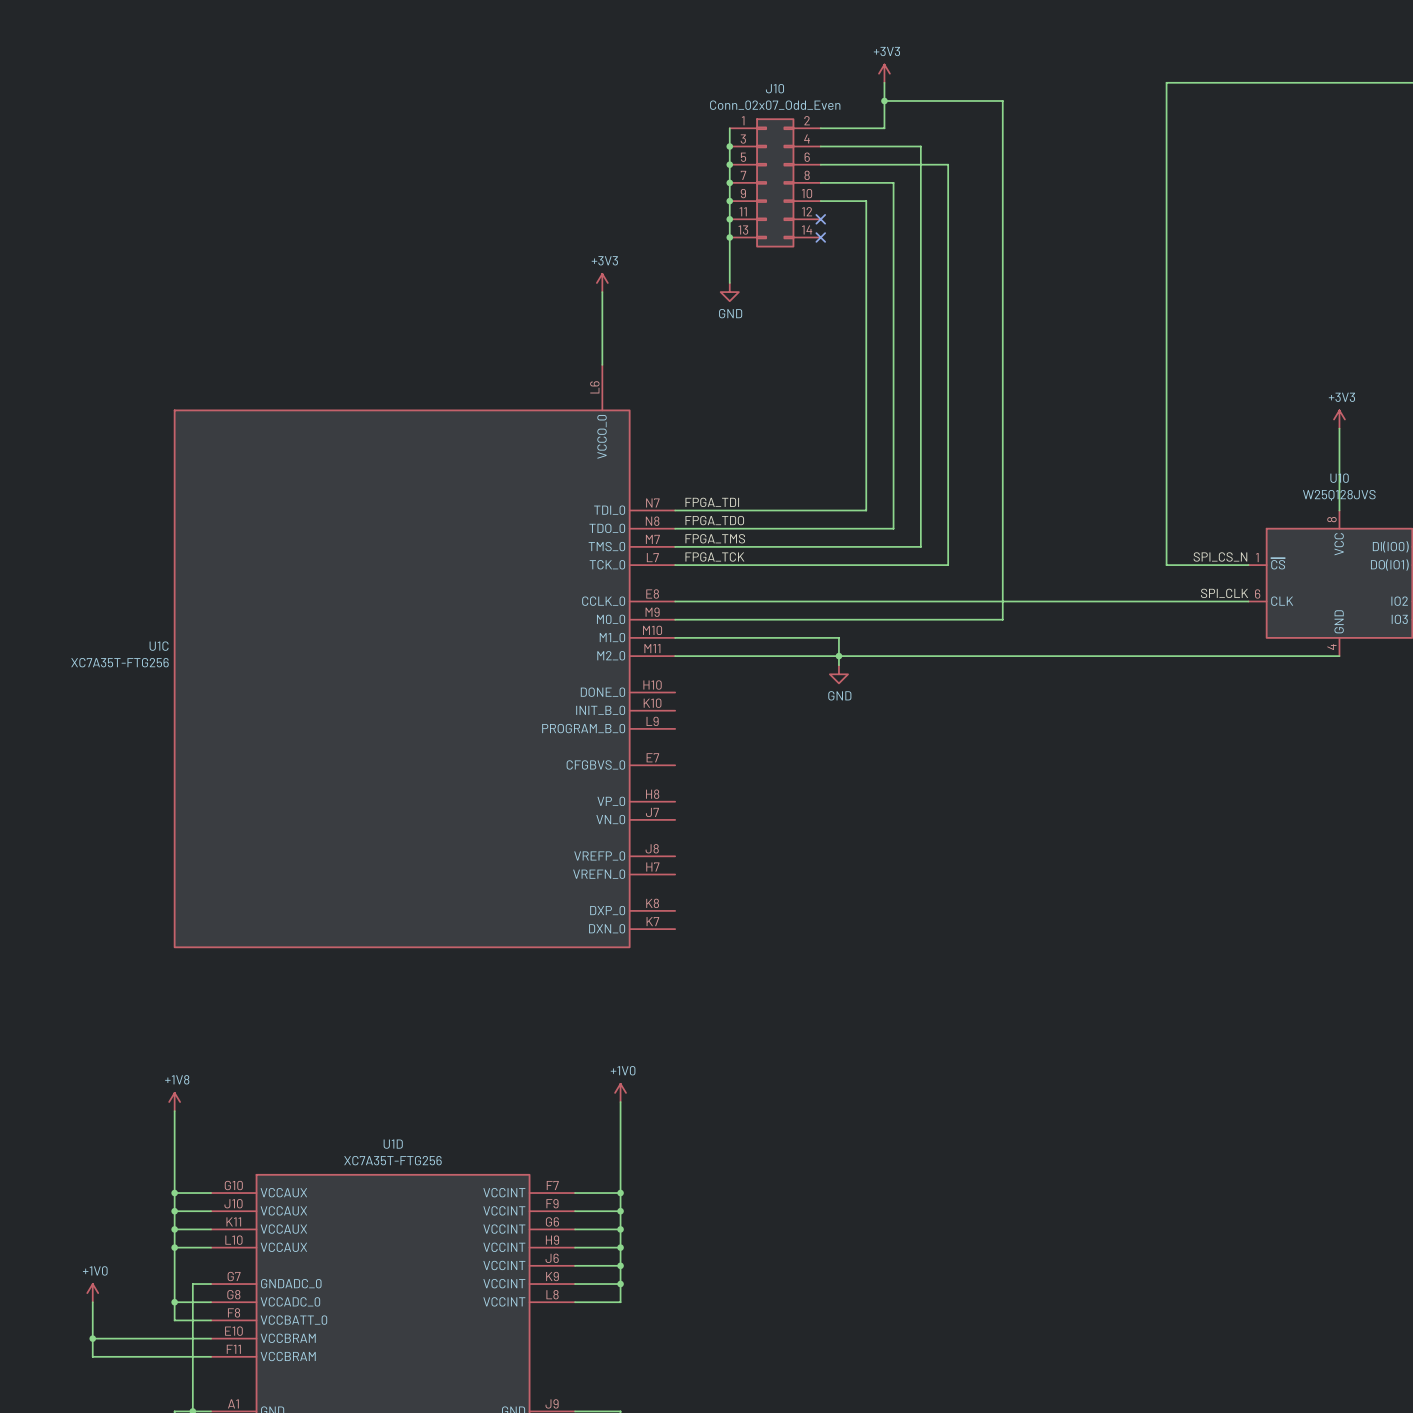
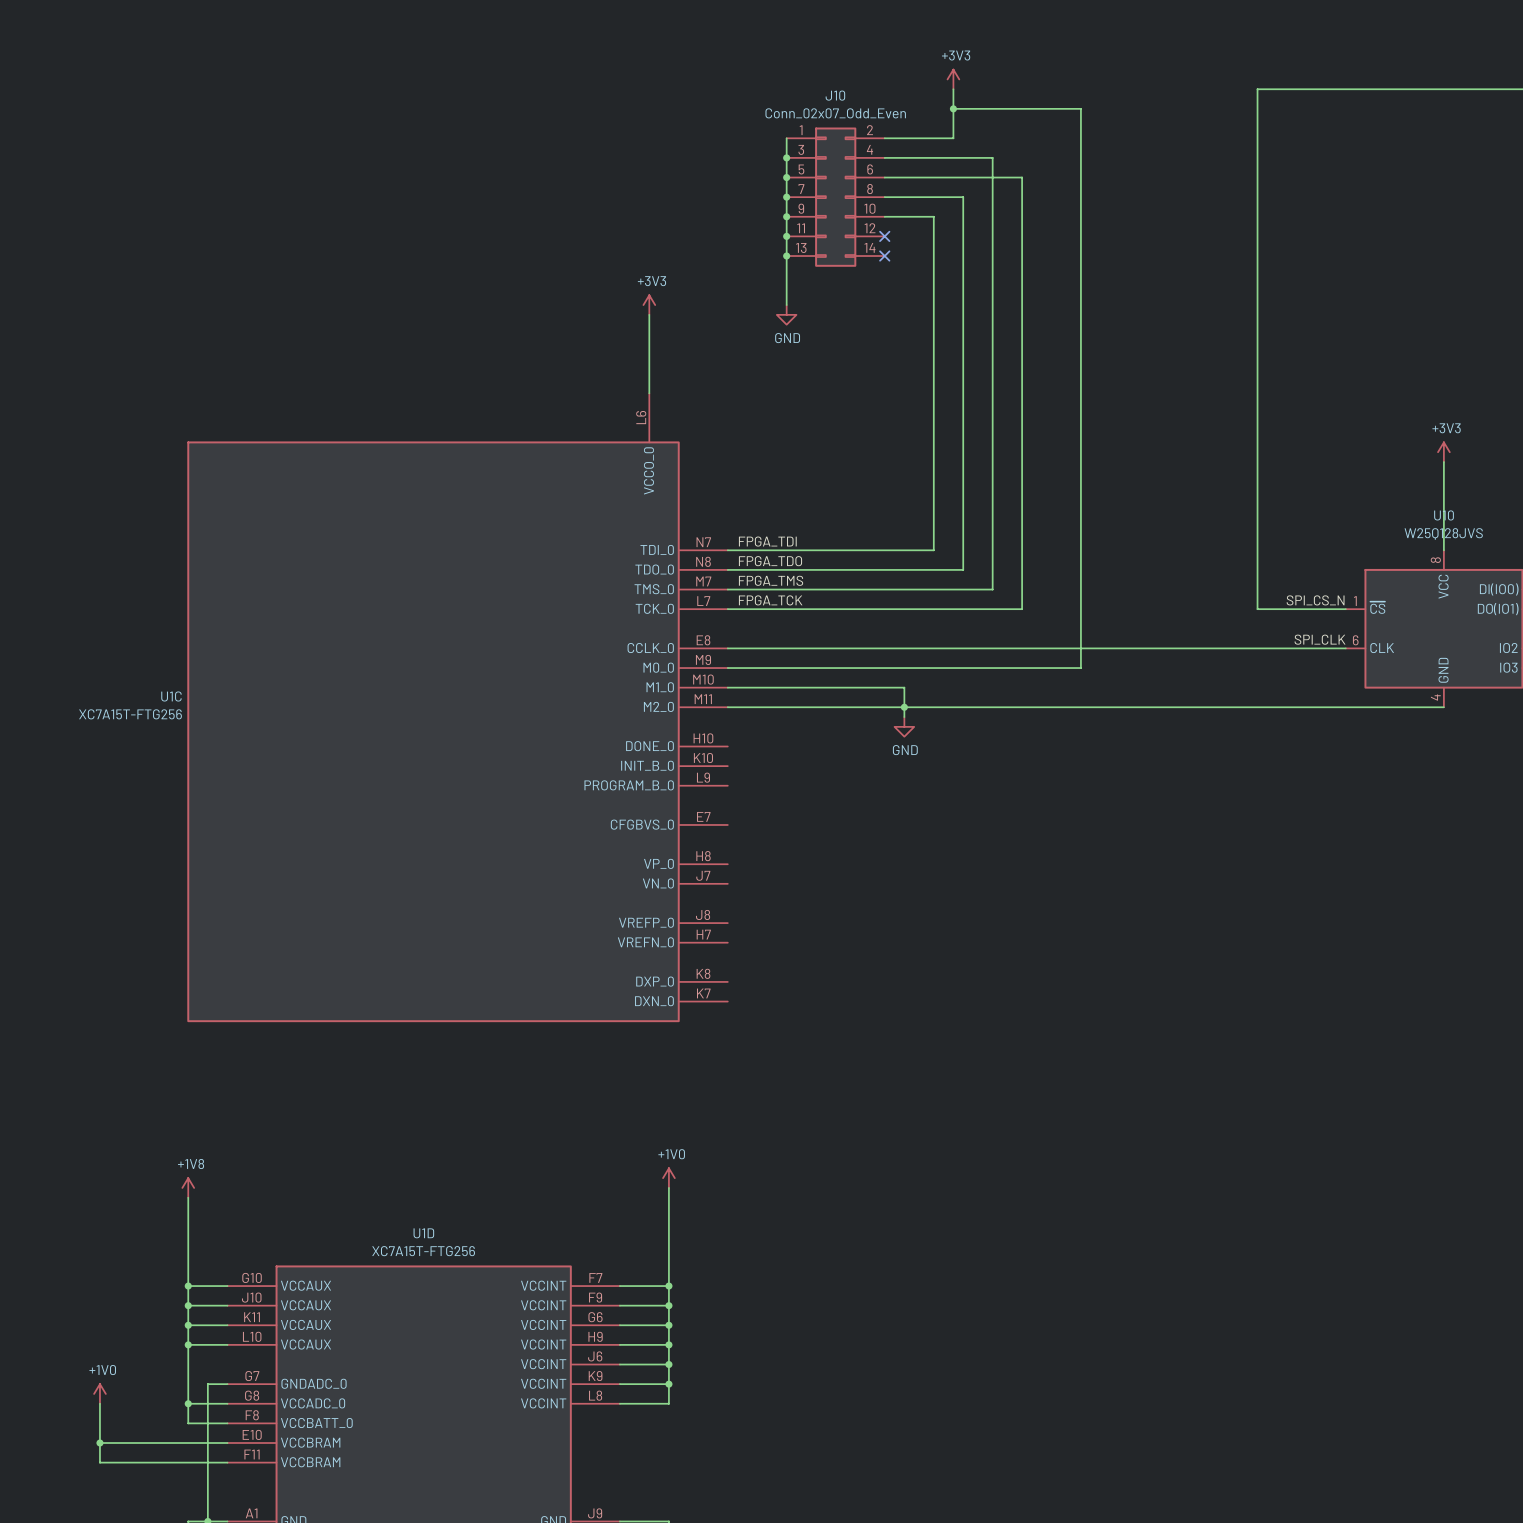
U1C value: XC7A35T-FTG256 (119, 662) -> XC7A15T-FTG256 (130, 714)
U1D value: XC7A35T-FTG256 (392, 1160) -> XC7A15T-FTG256 (423, 1251)

